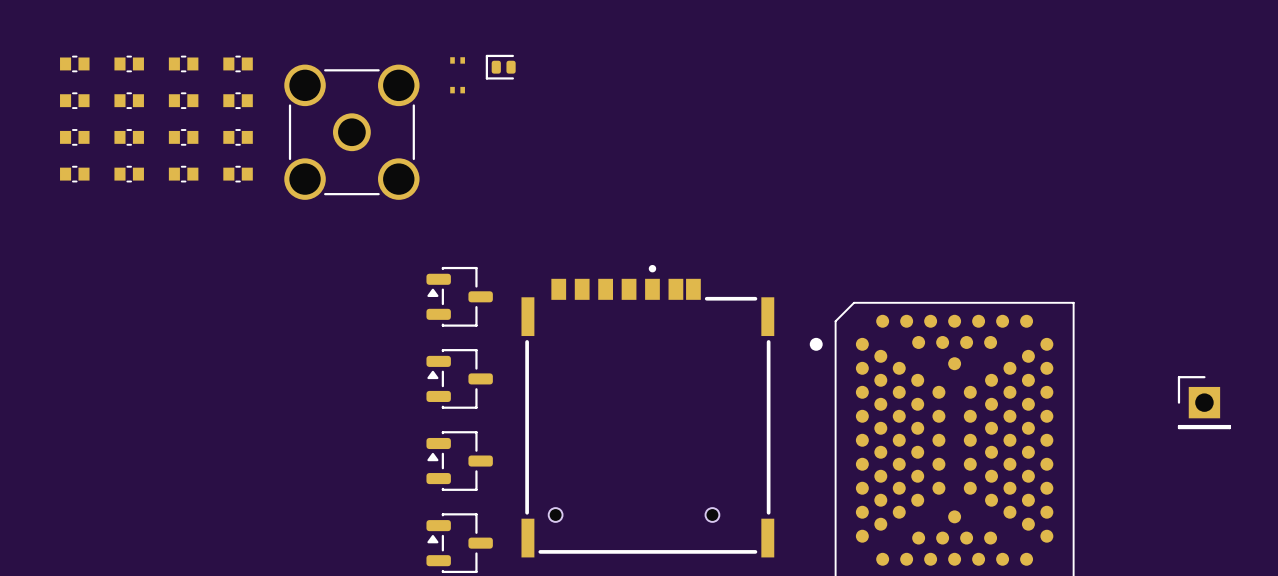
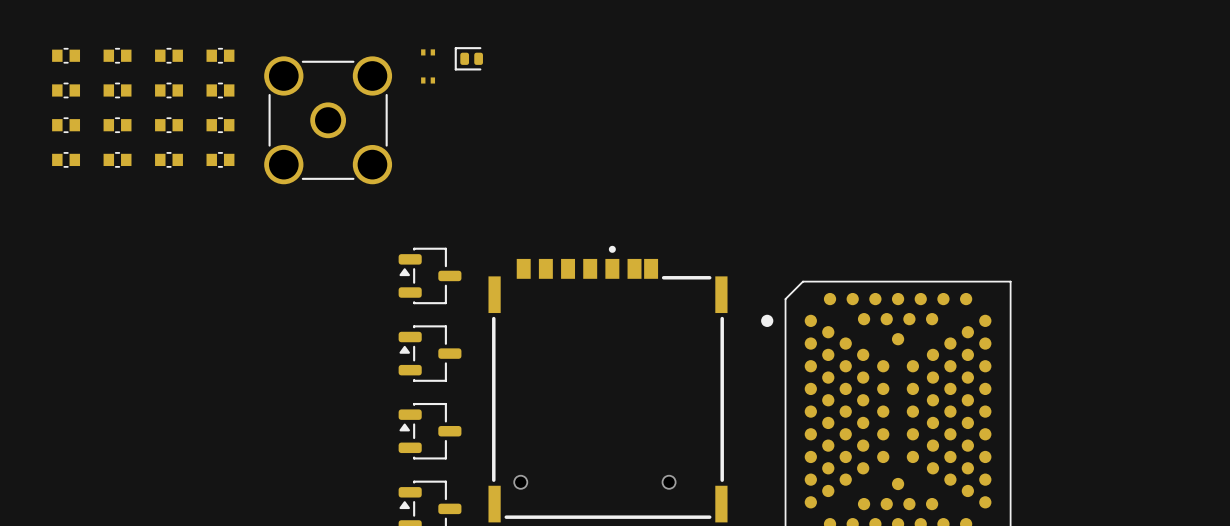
part: (1204, 402) -> none

